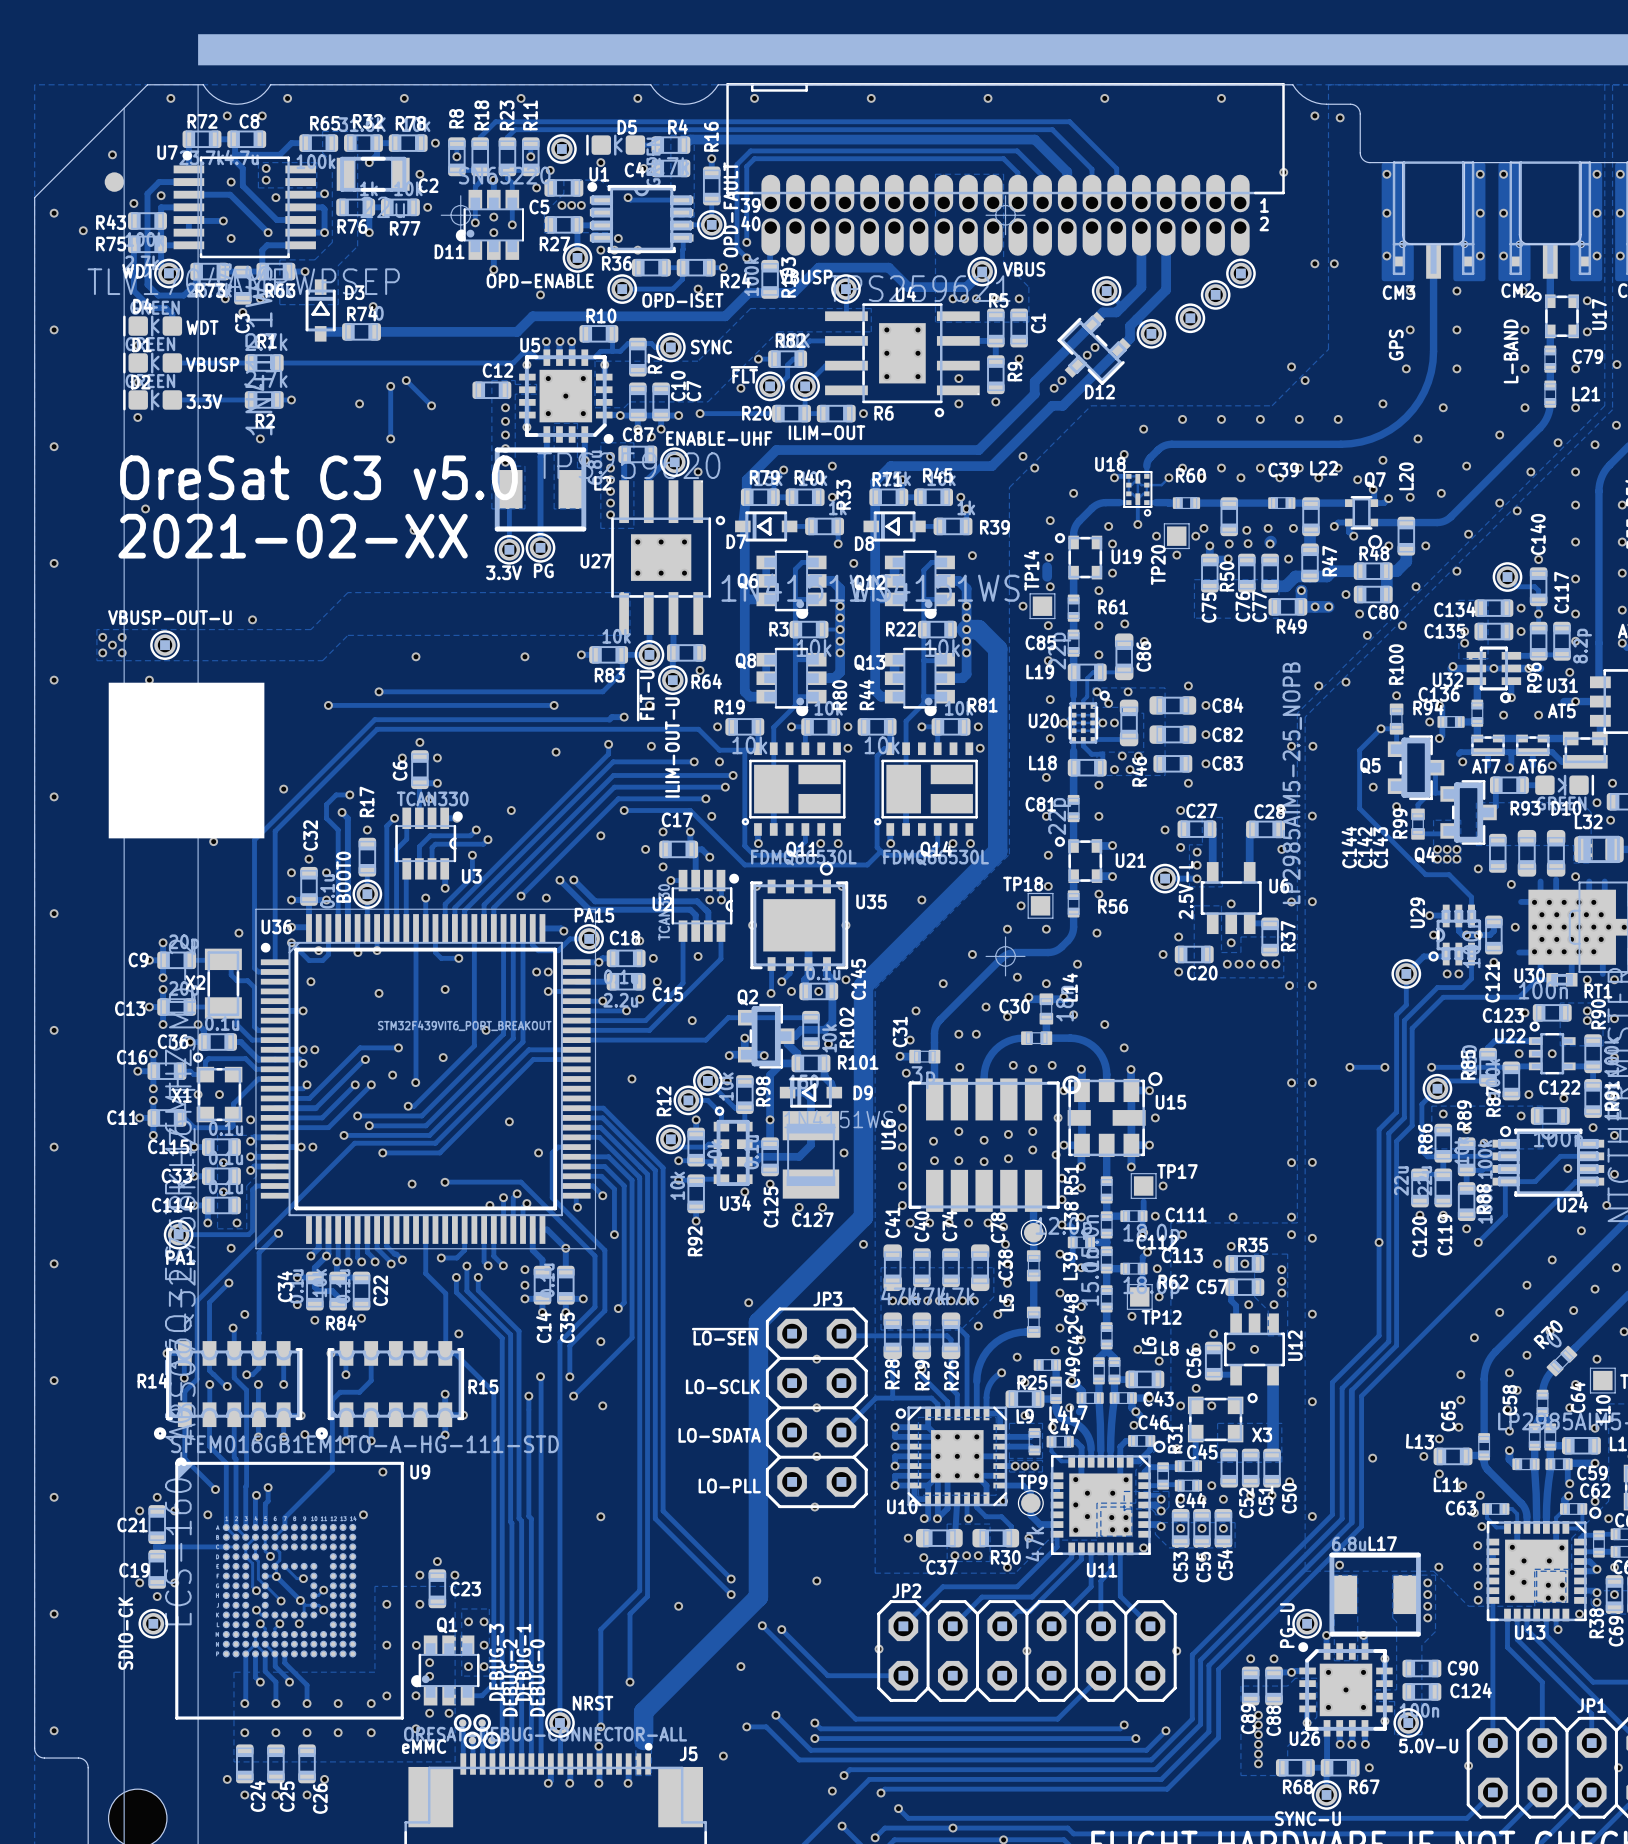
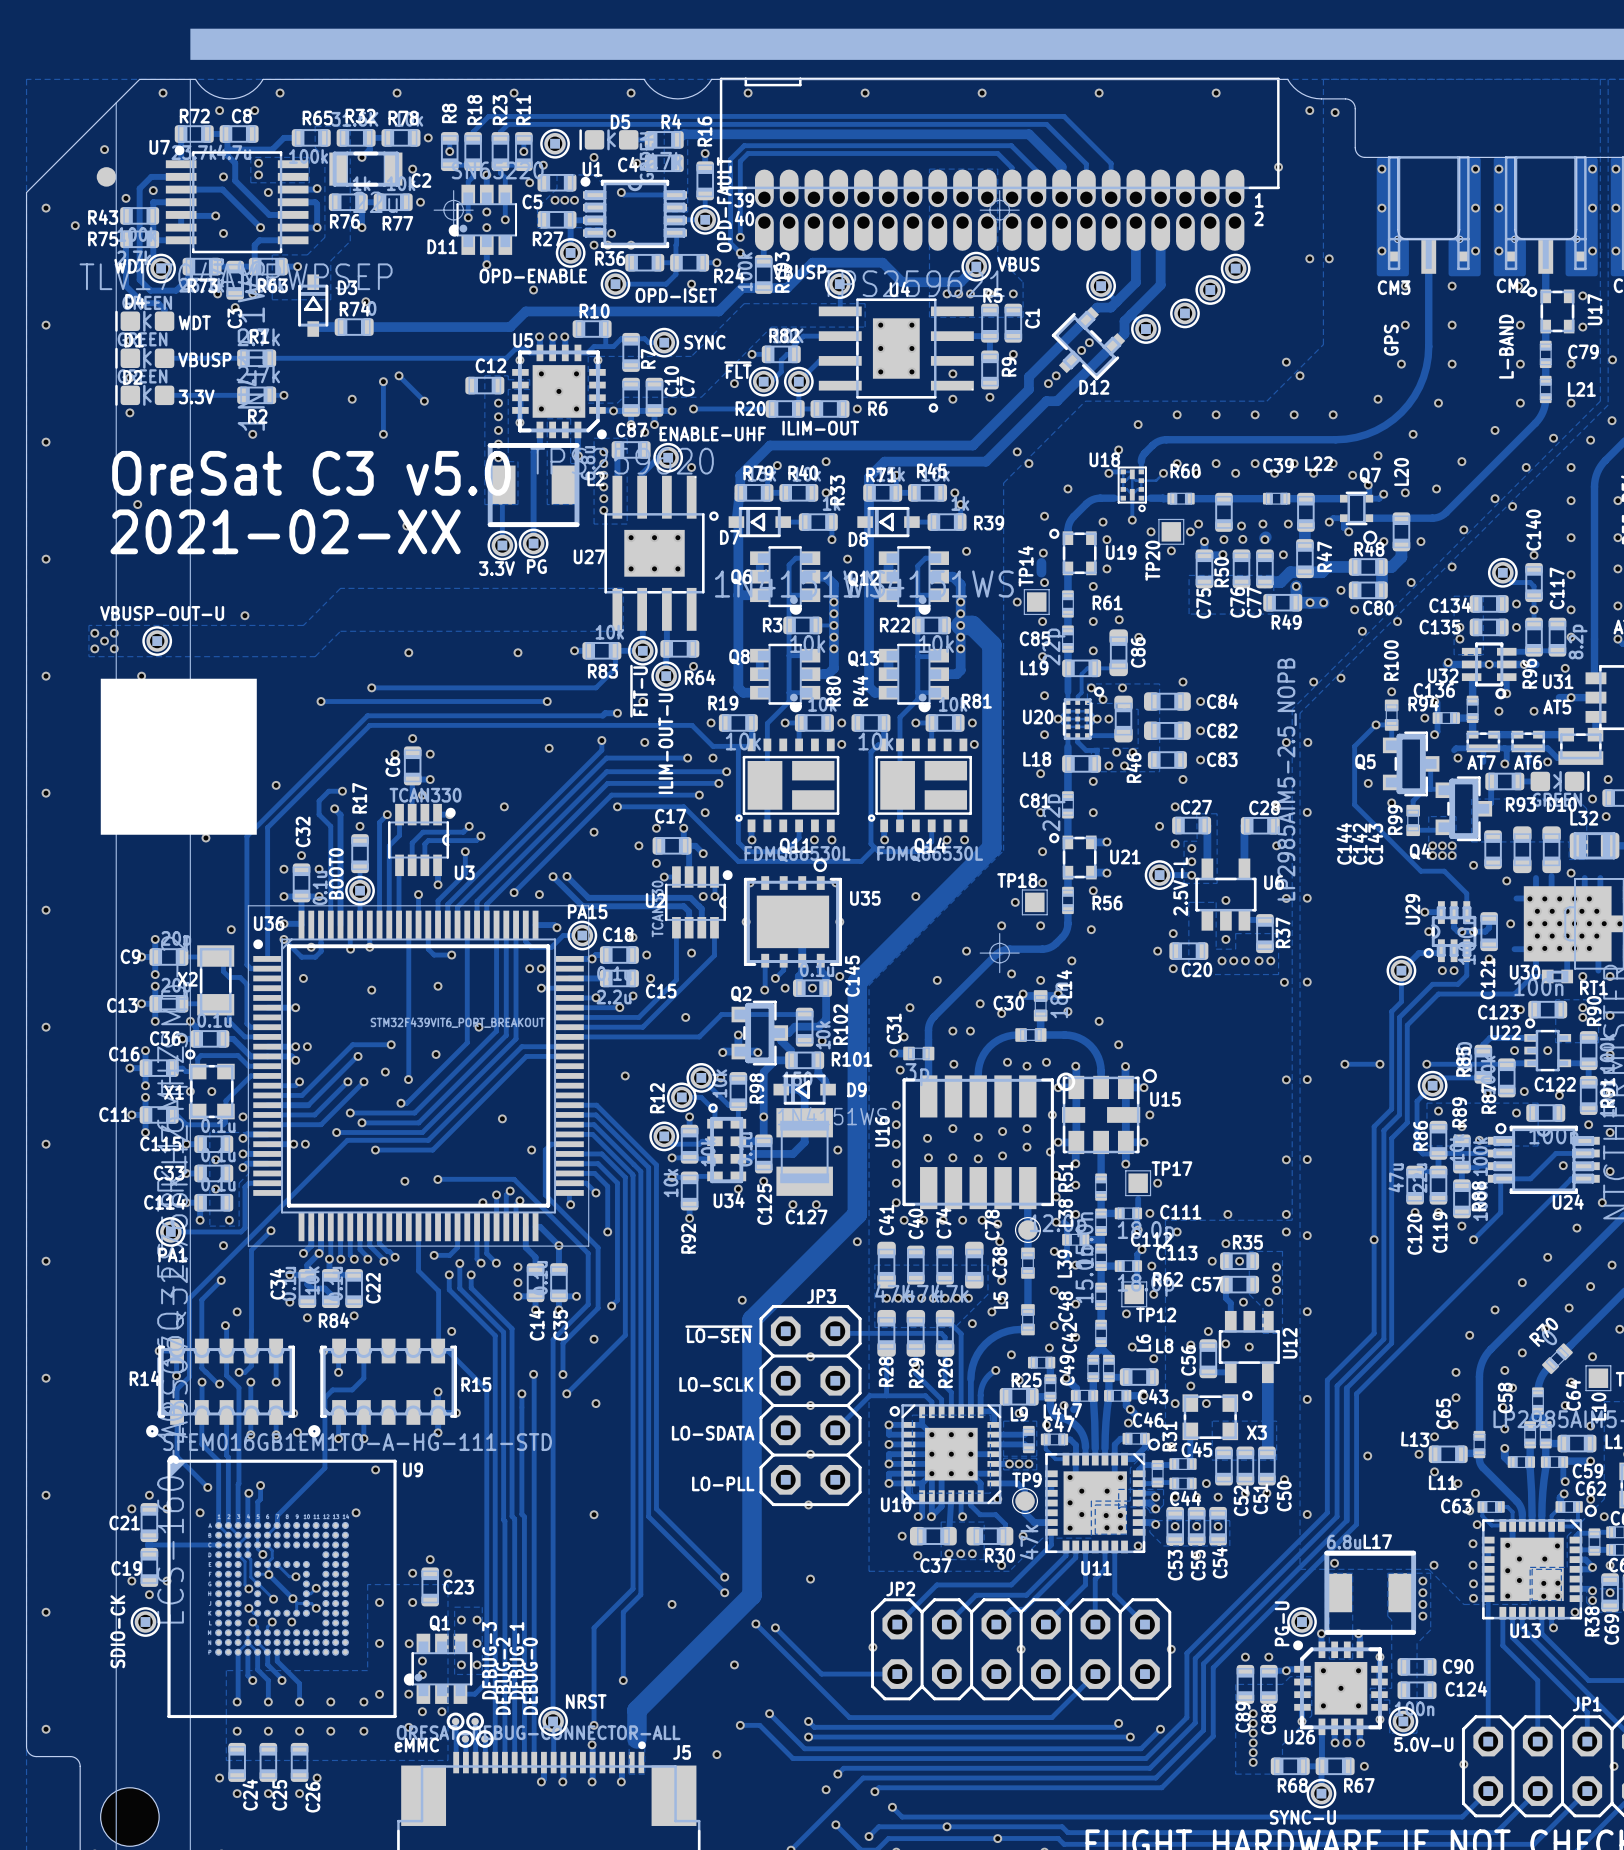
C120 value: 22u (1401, 1181) -> 47u (1396, 1177)

